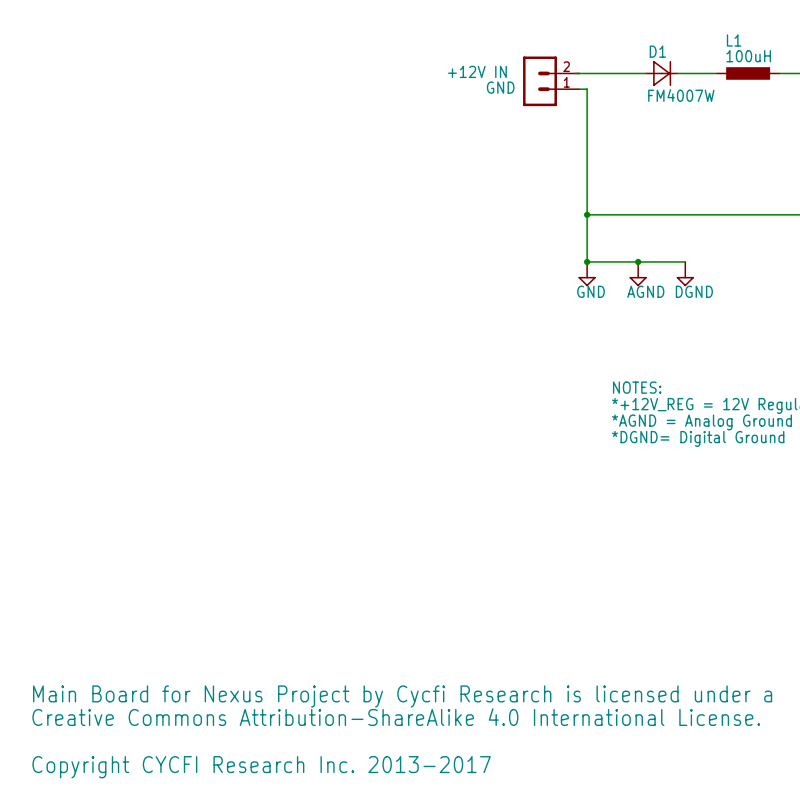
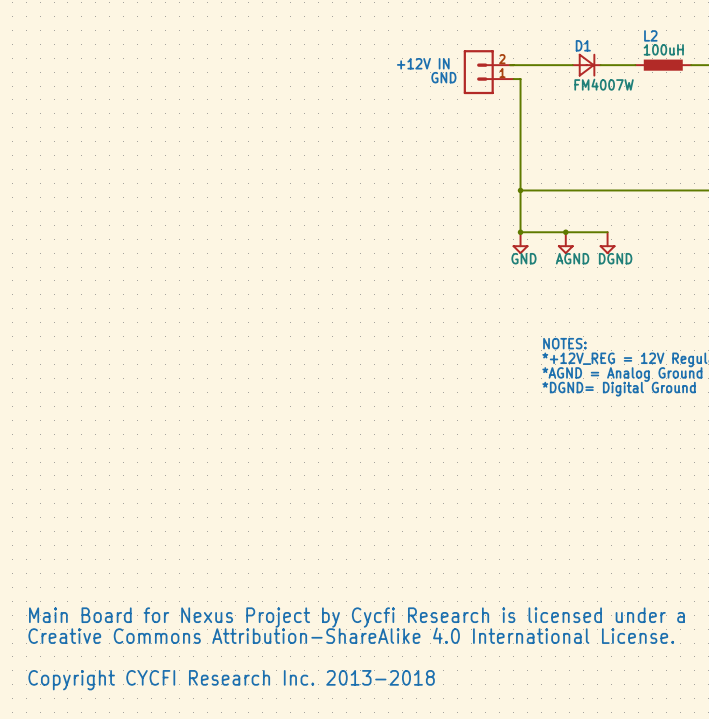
L1 name: L1 (734, 40) -> L2 (650, 35)
text: Copyright CYCFI Research Inc. 2013-2017 (261, 767) -> Copyright CYCFI Research Inc. 2013-2018 (231, 680)

